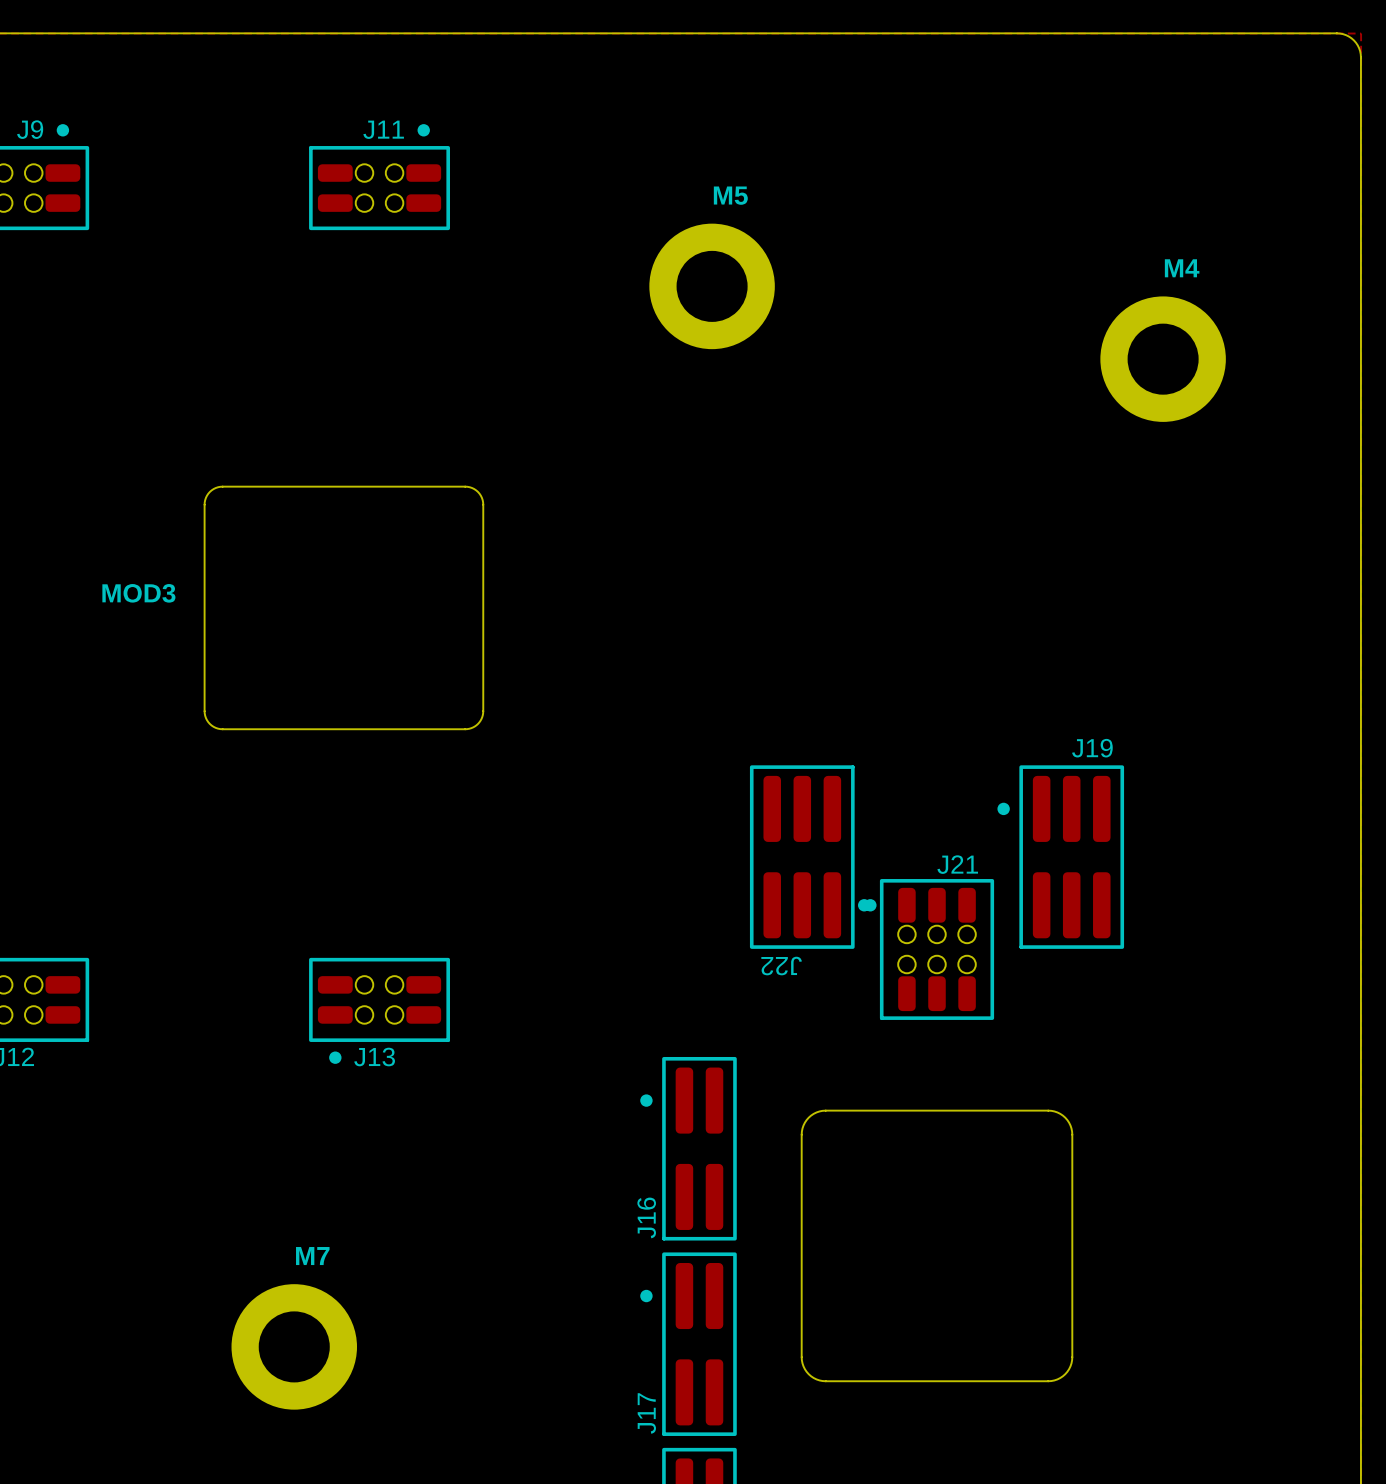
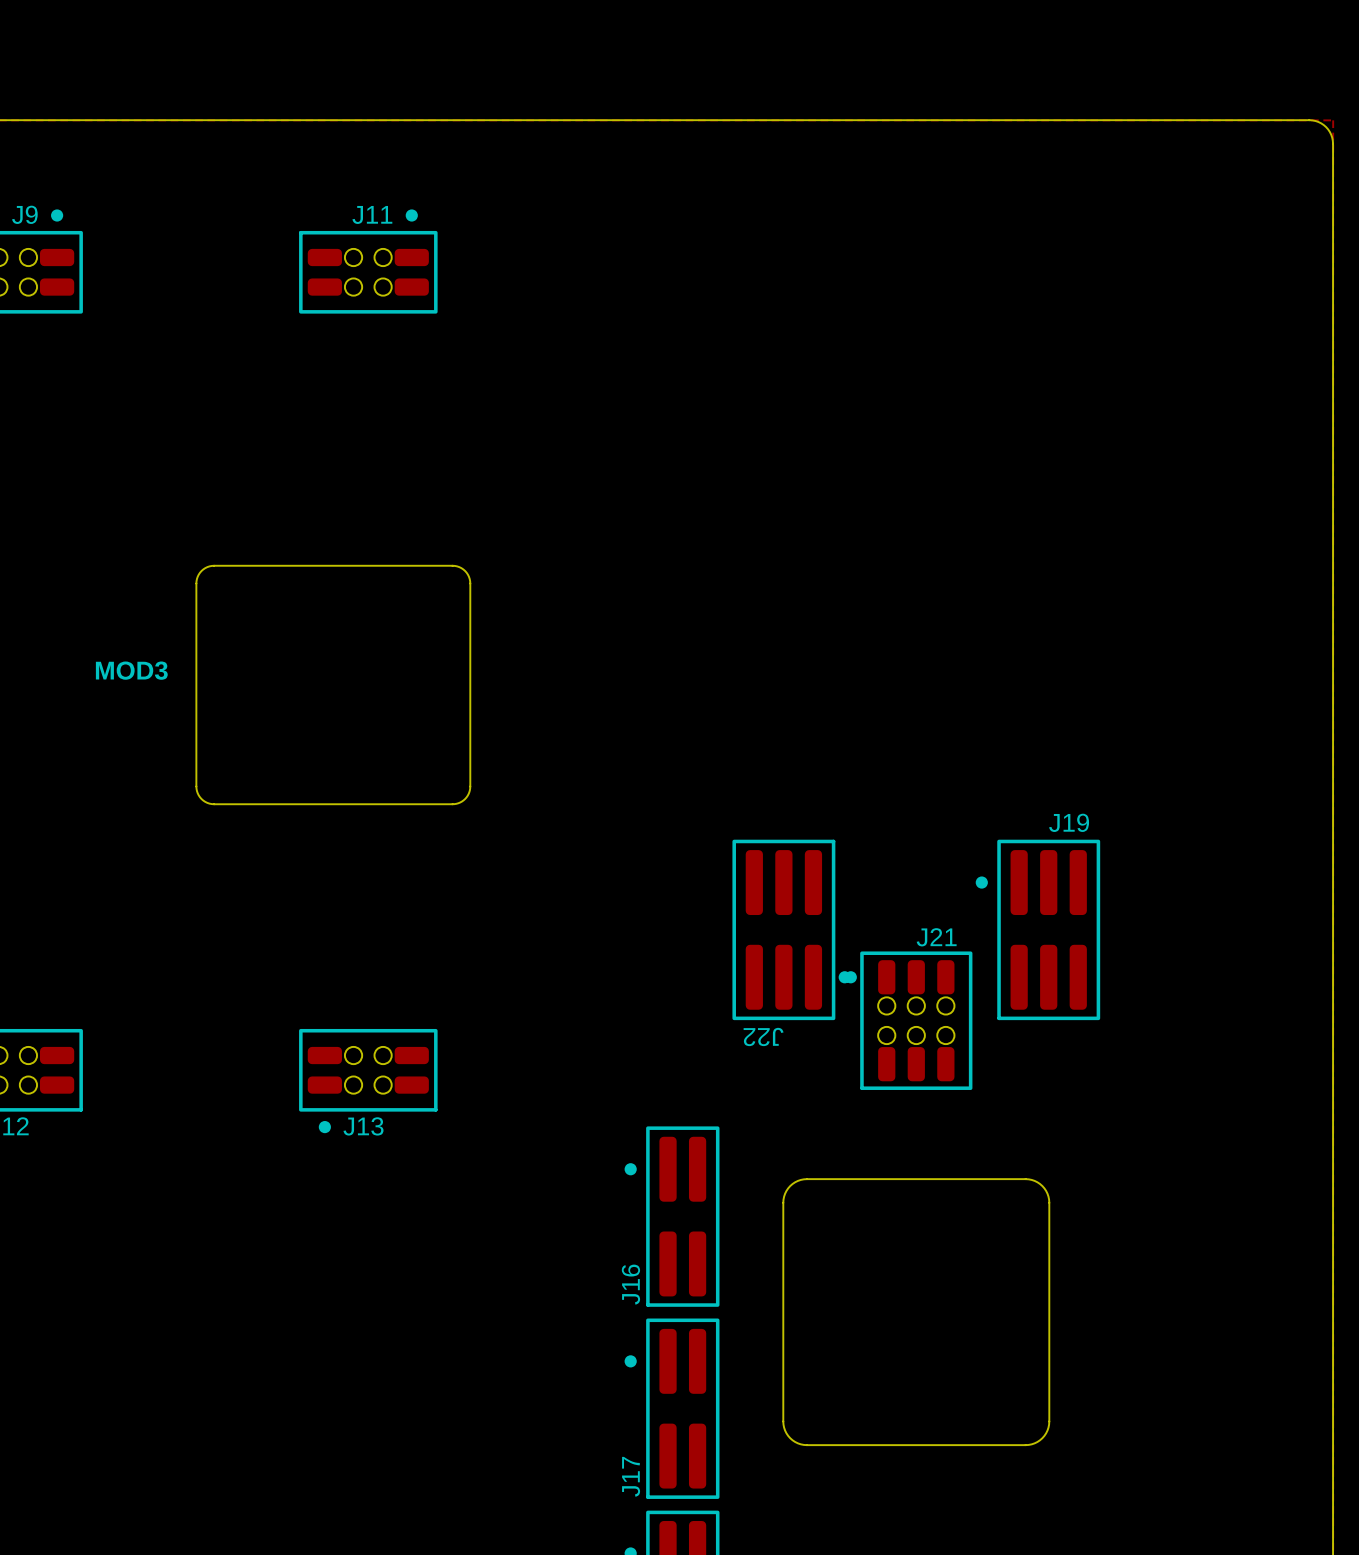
M5: (712, 286) -> none
M4: (1163, 359) -> none
M7: (294, 1346) -> none

